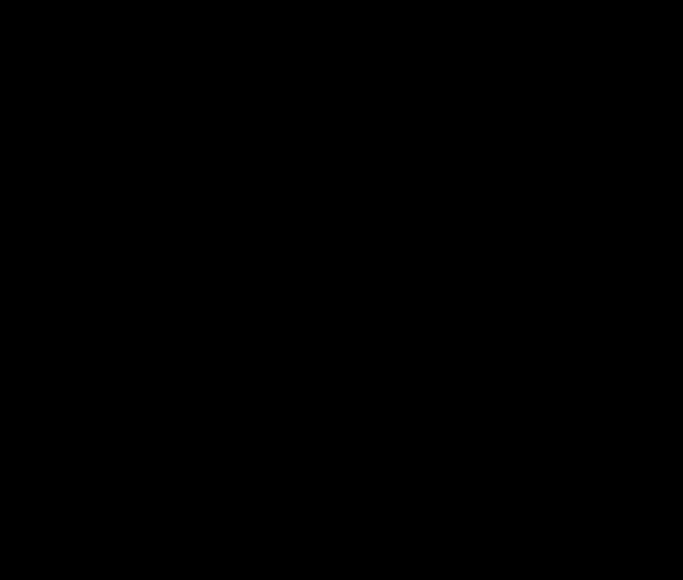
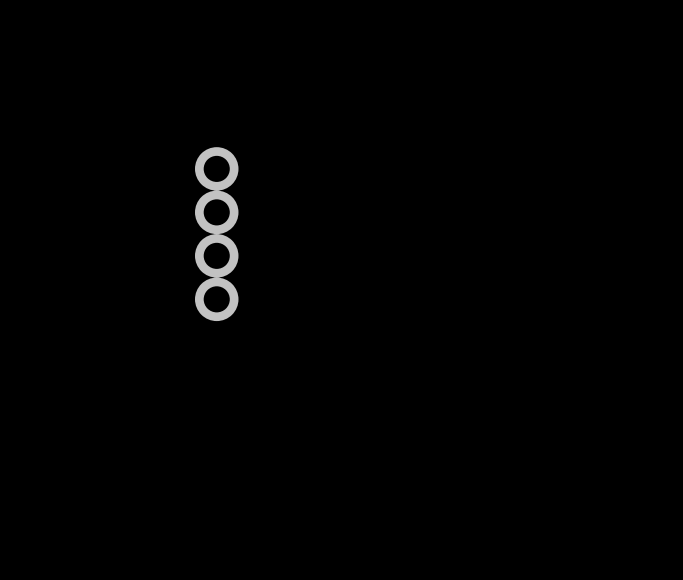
via: none -> (216, 168)
via: none -> (216, 212)
via: none -> (216, 255)
via: none -> (216, 299)

